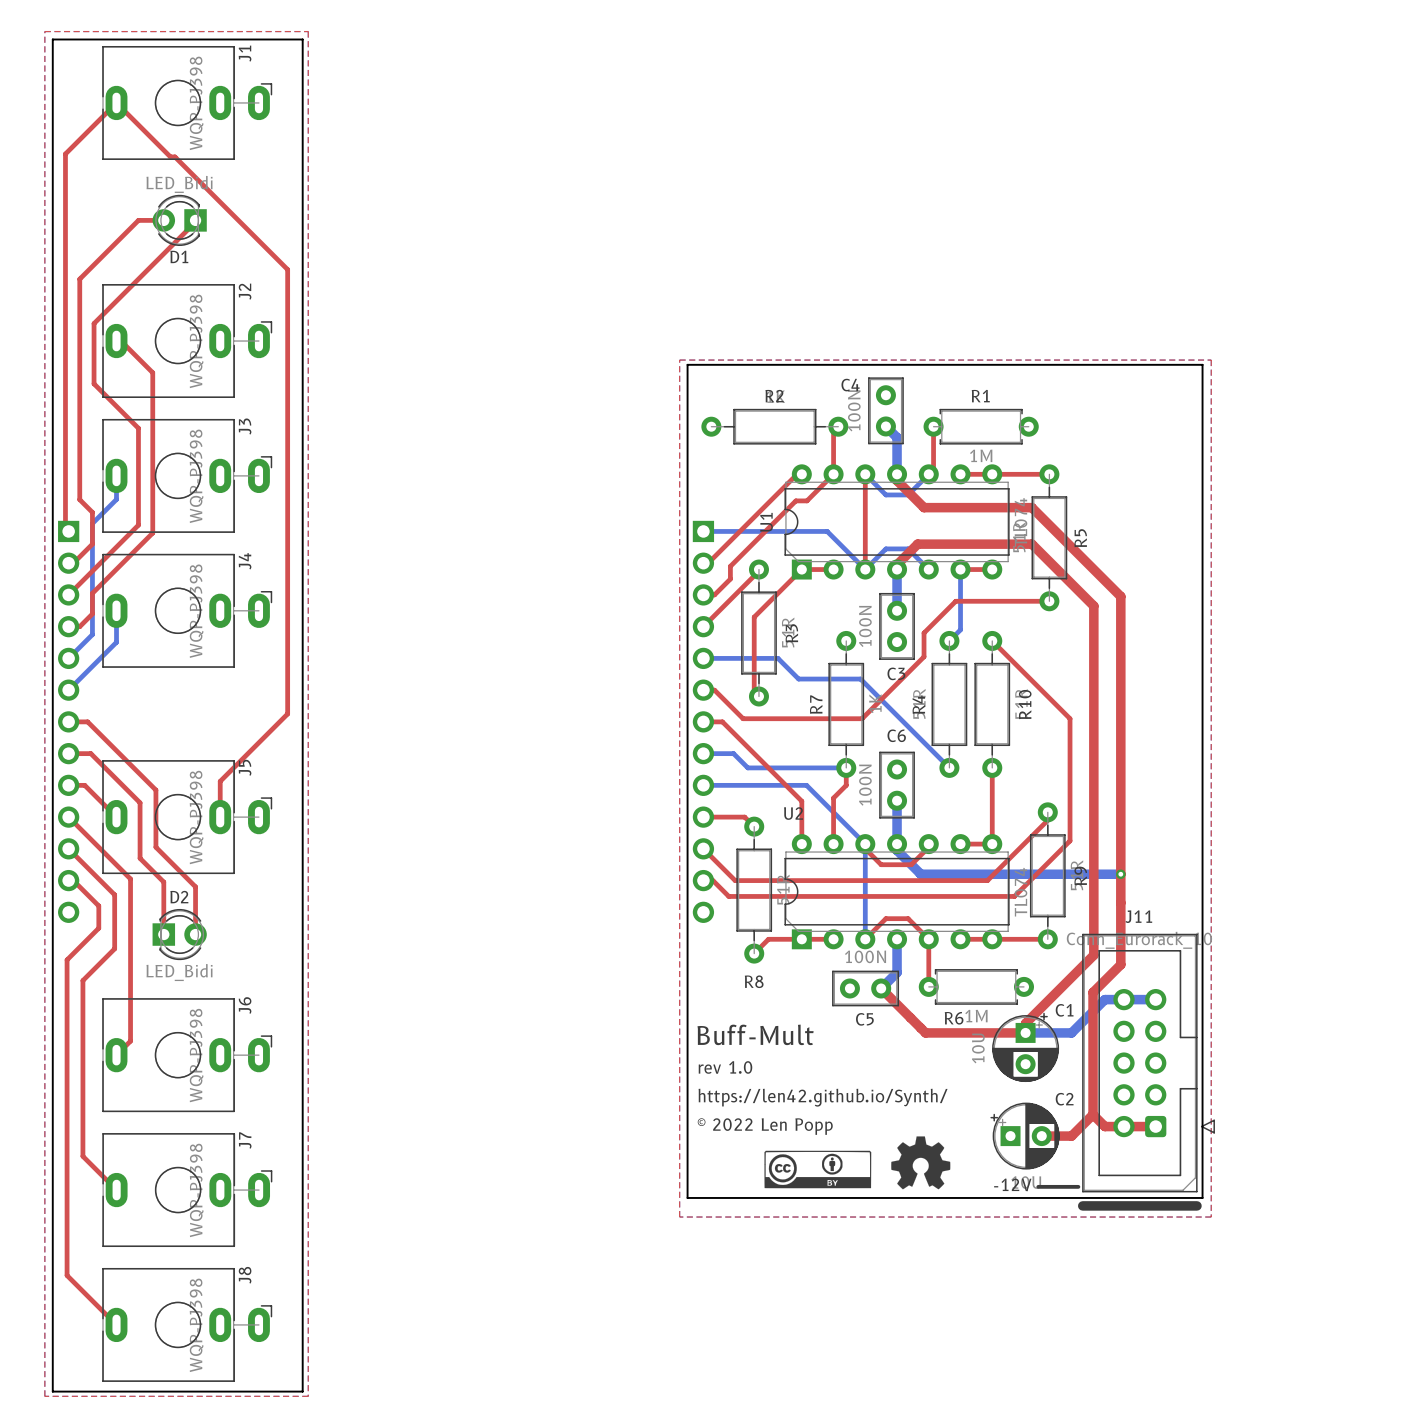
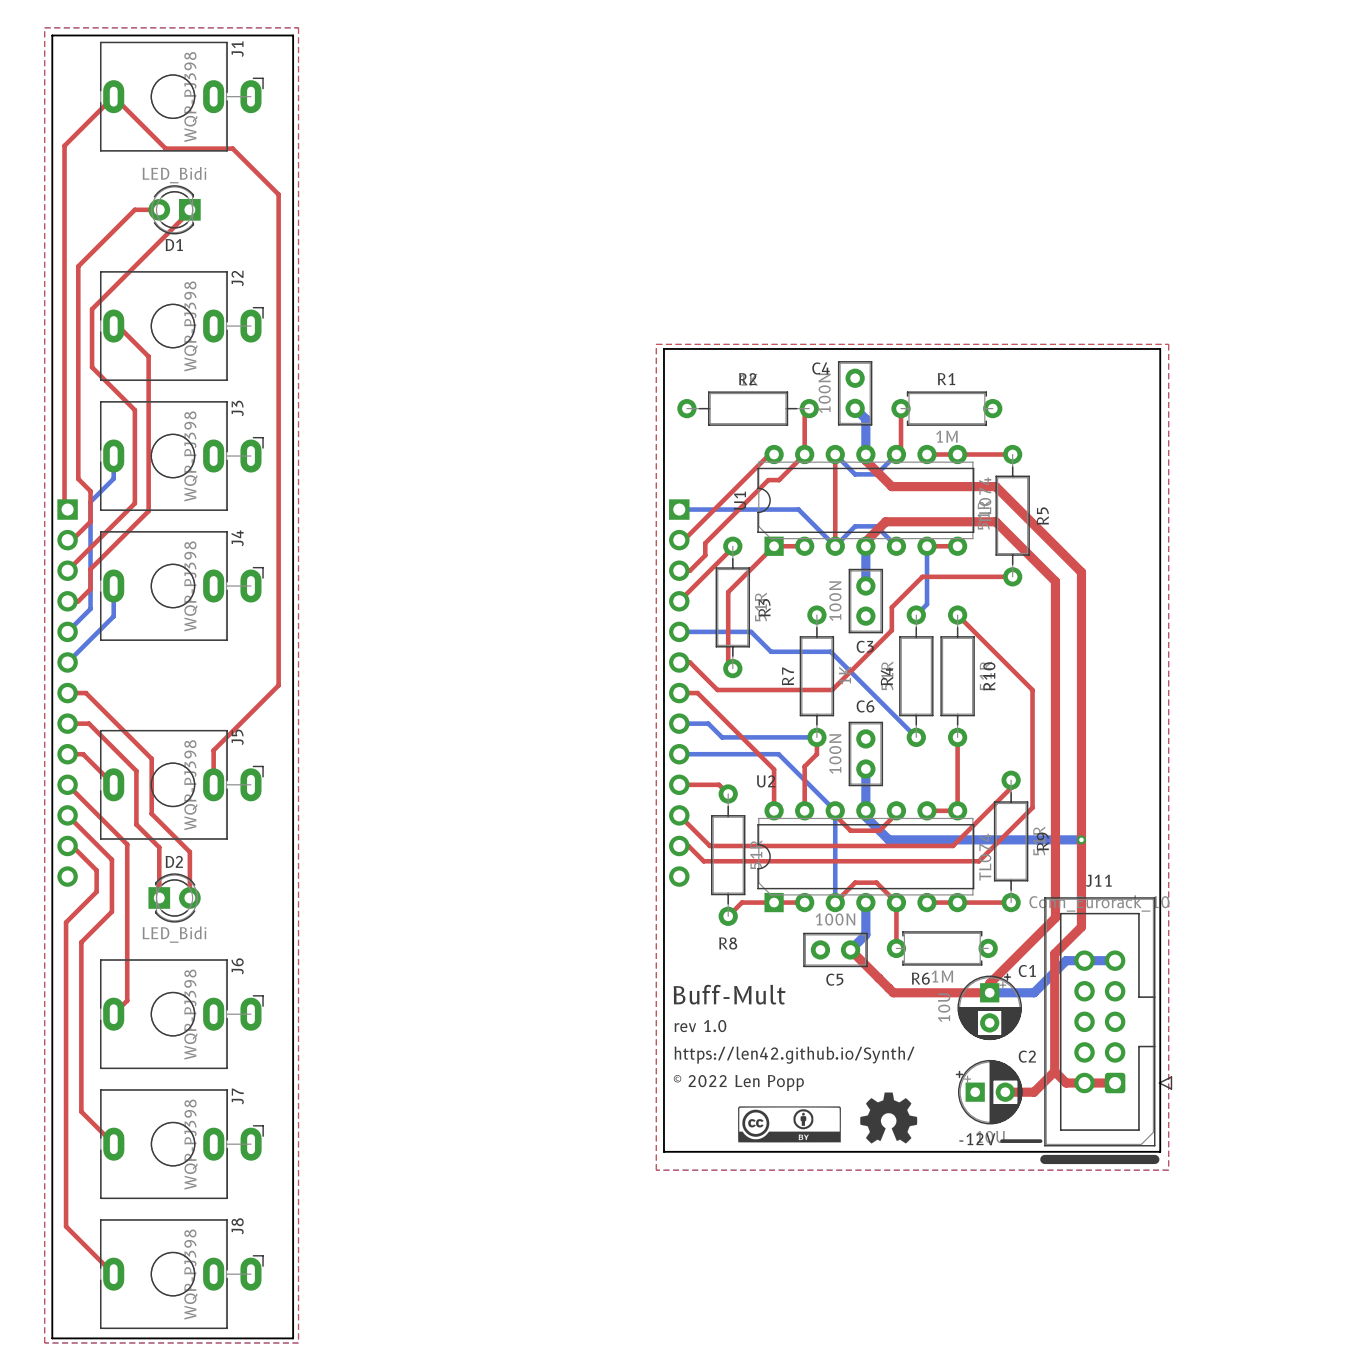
top track: (174, 156) (287, 269) -> (170, 148) (232, 148) (278, 194) (278, 257)

